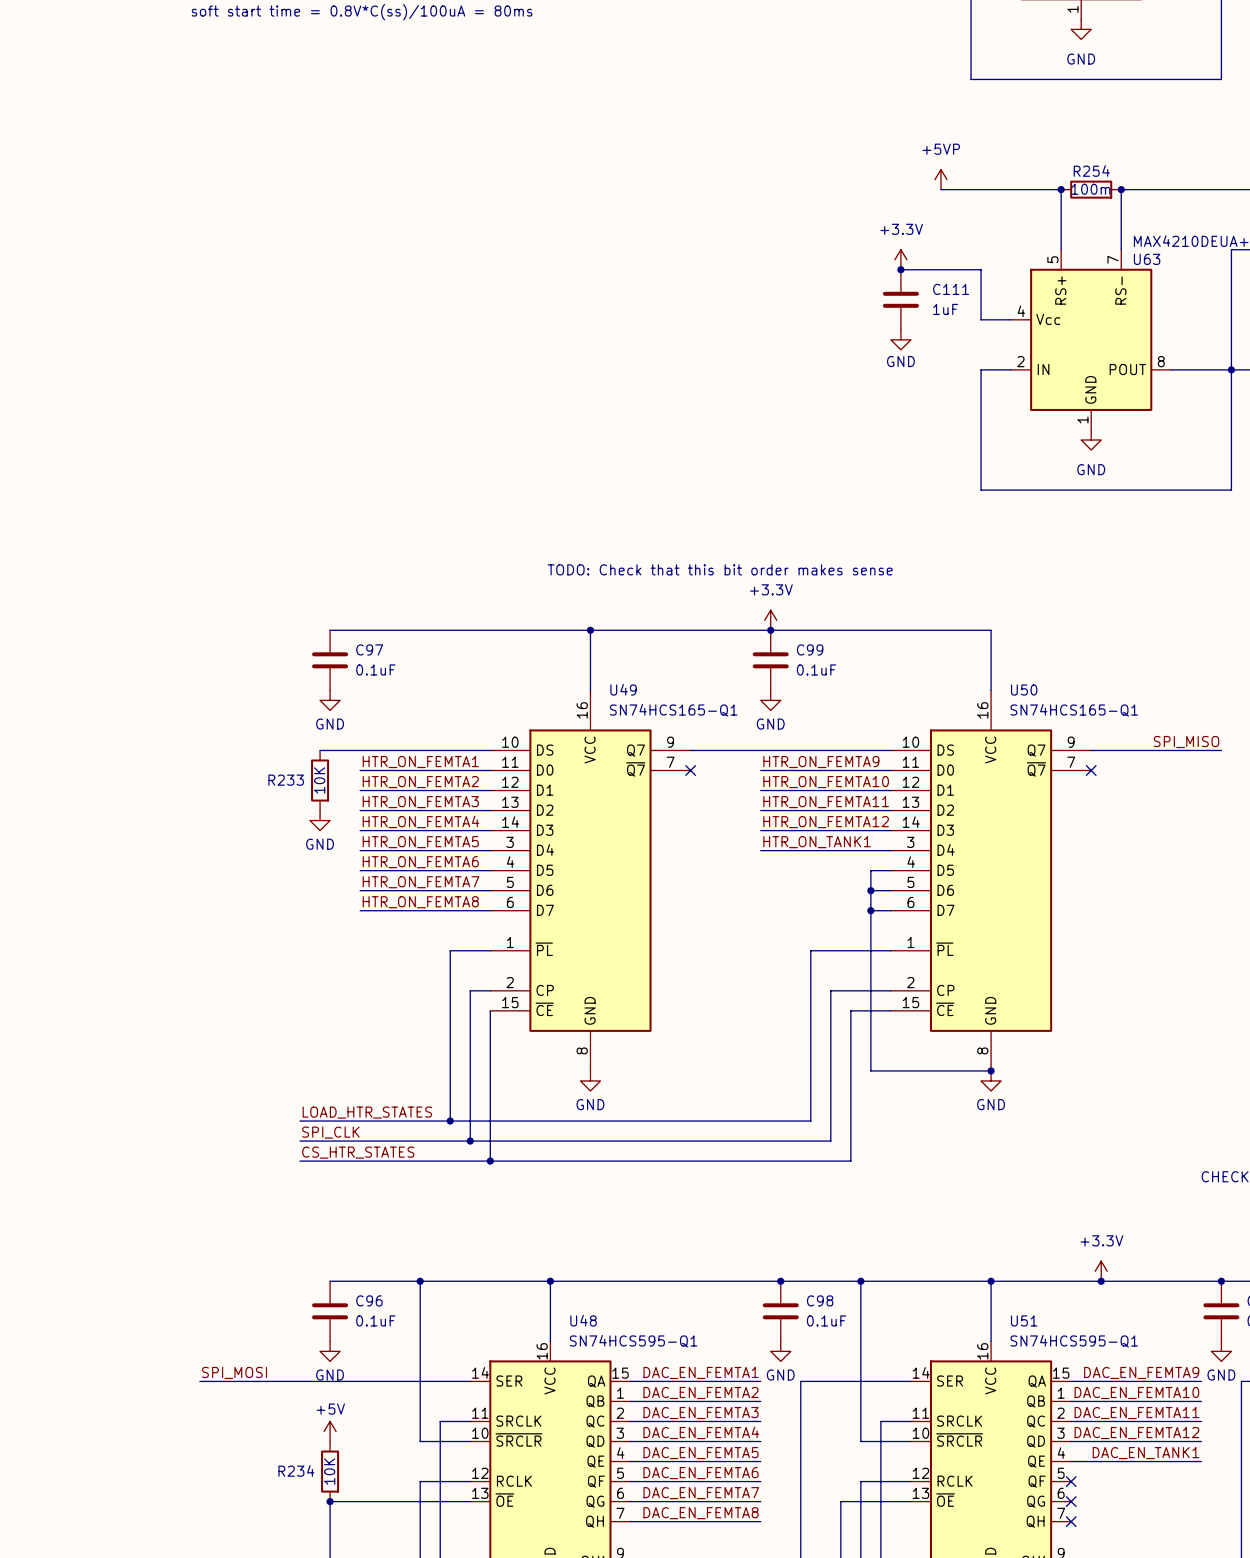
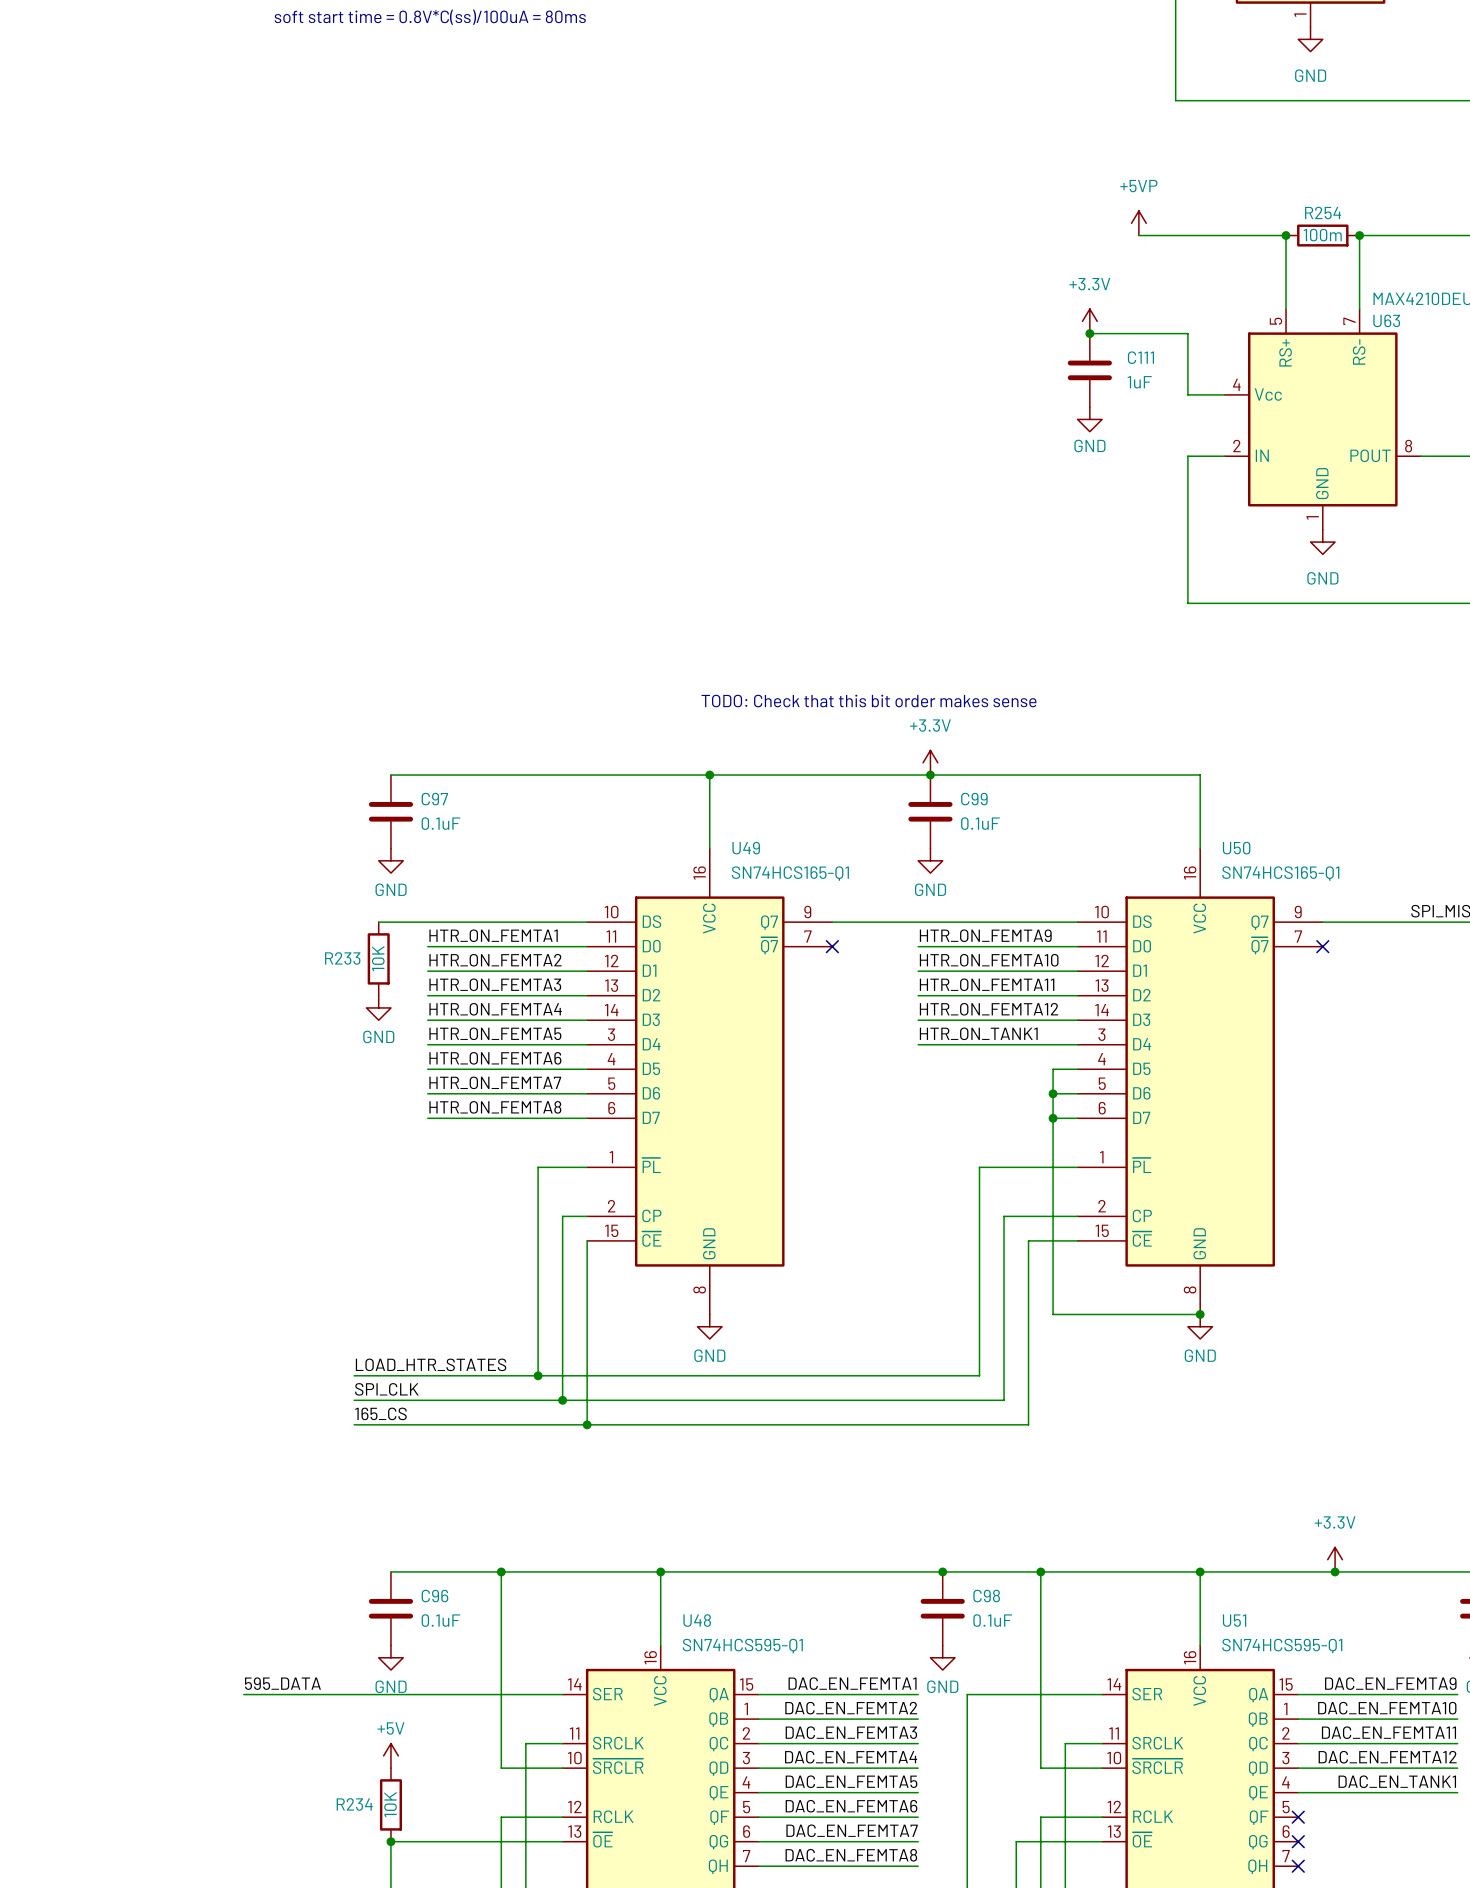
label: CS_HTR_STATES (358, 1152) -> 165_CS (380, 1413)
label: SPI_MOSI (234, 1372) -> none
label: none -> 595_DATA (282, 1683)
wire: (199, 1381) (209, 1381) -> none

